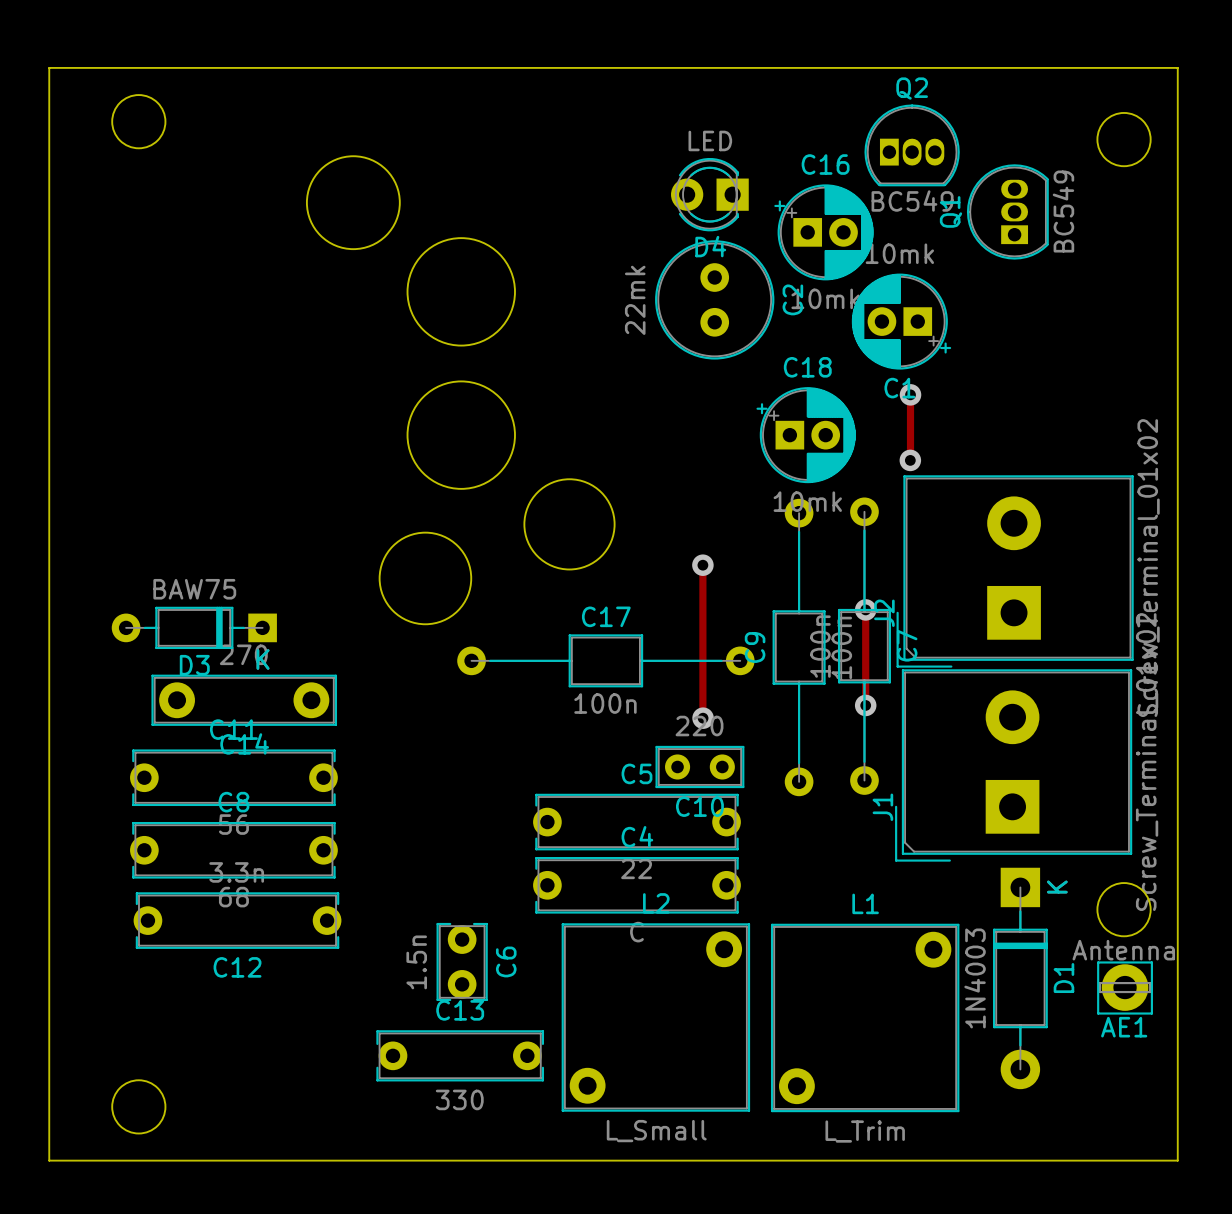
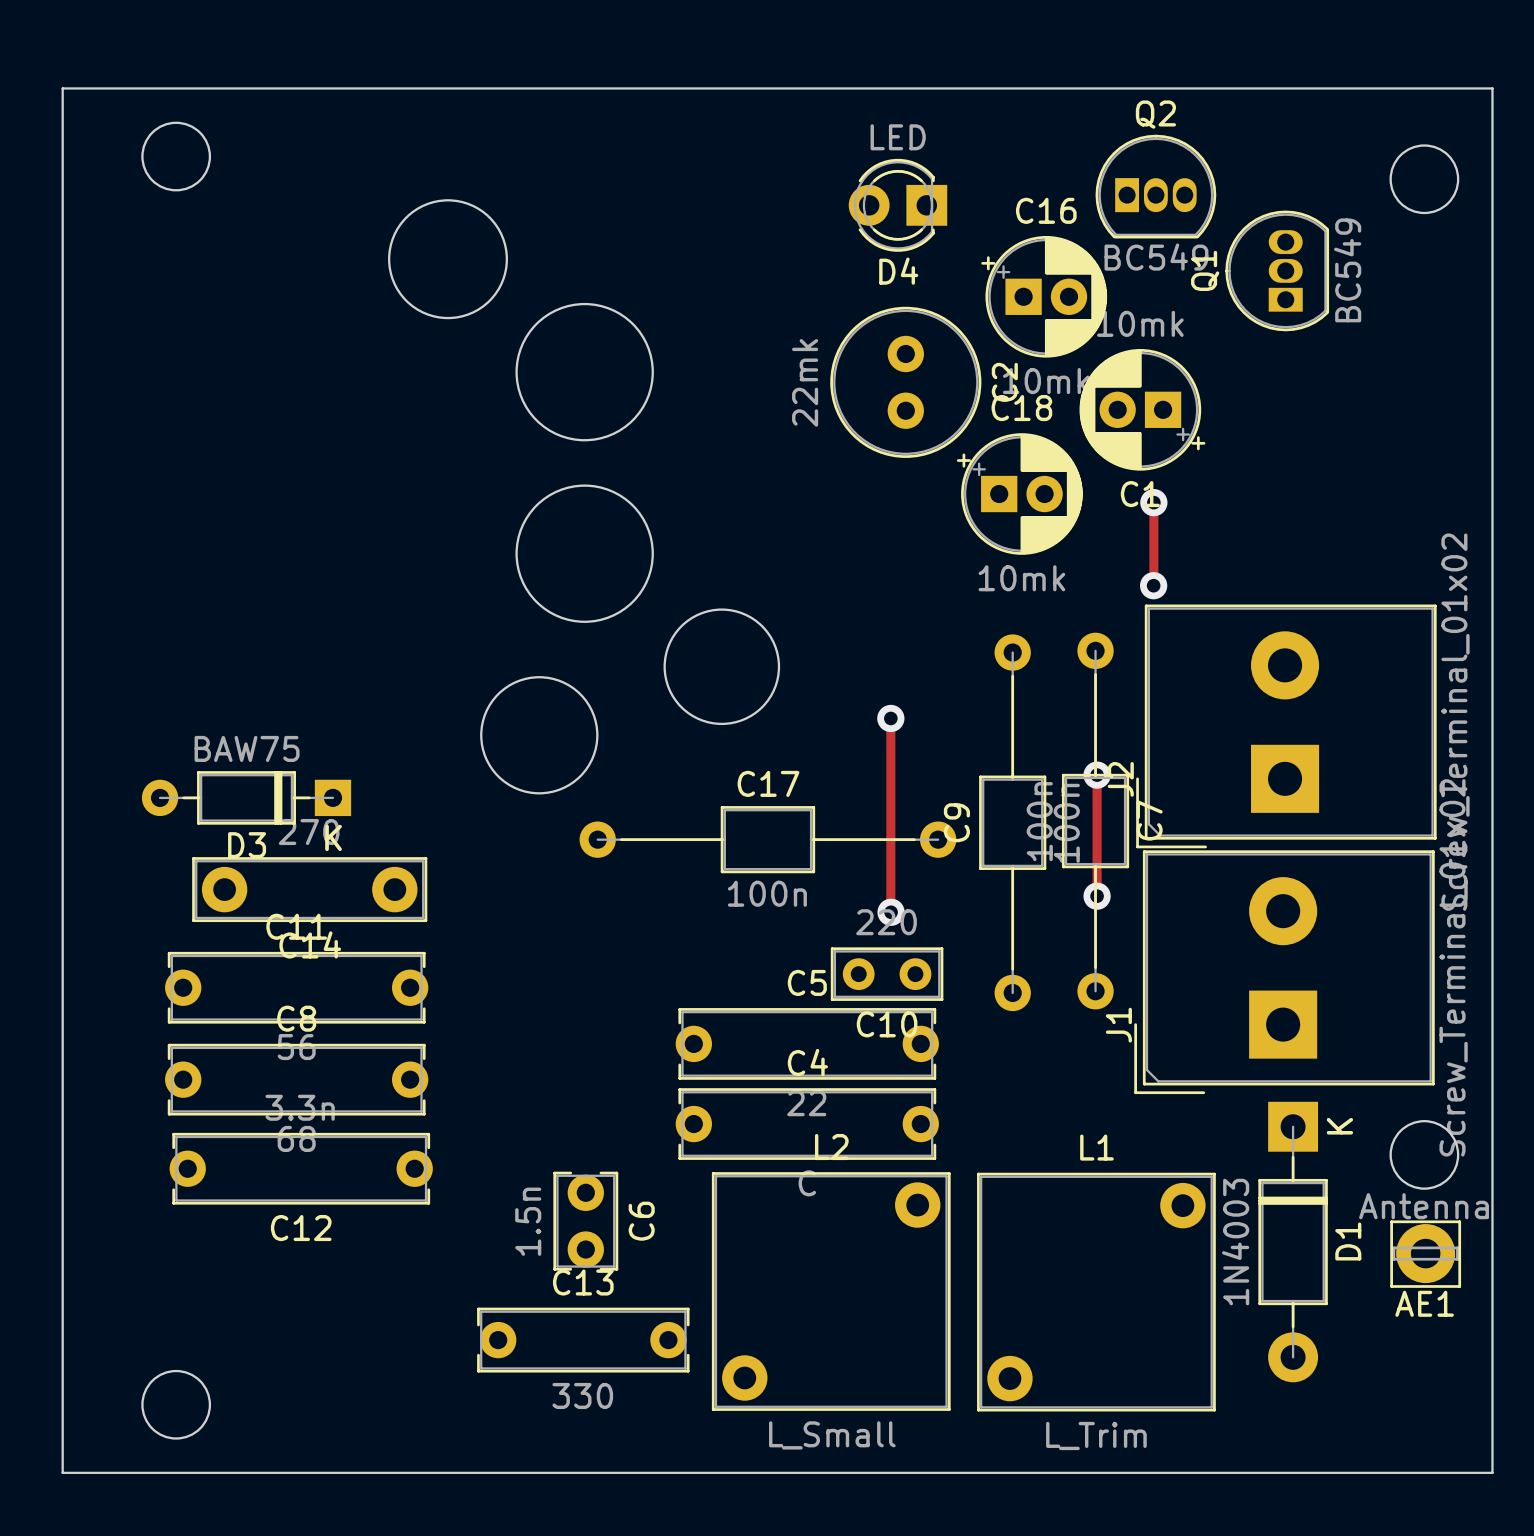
D4 position: (709, 194) -> (897, 205)
C18 position: (806, 435) -> (1019, 494)

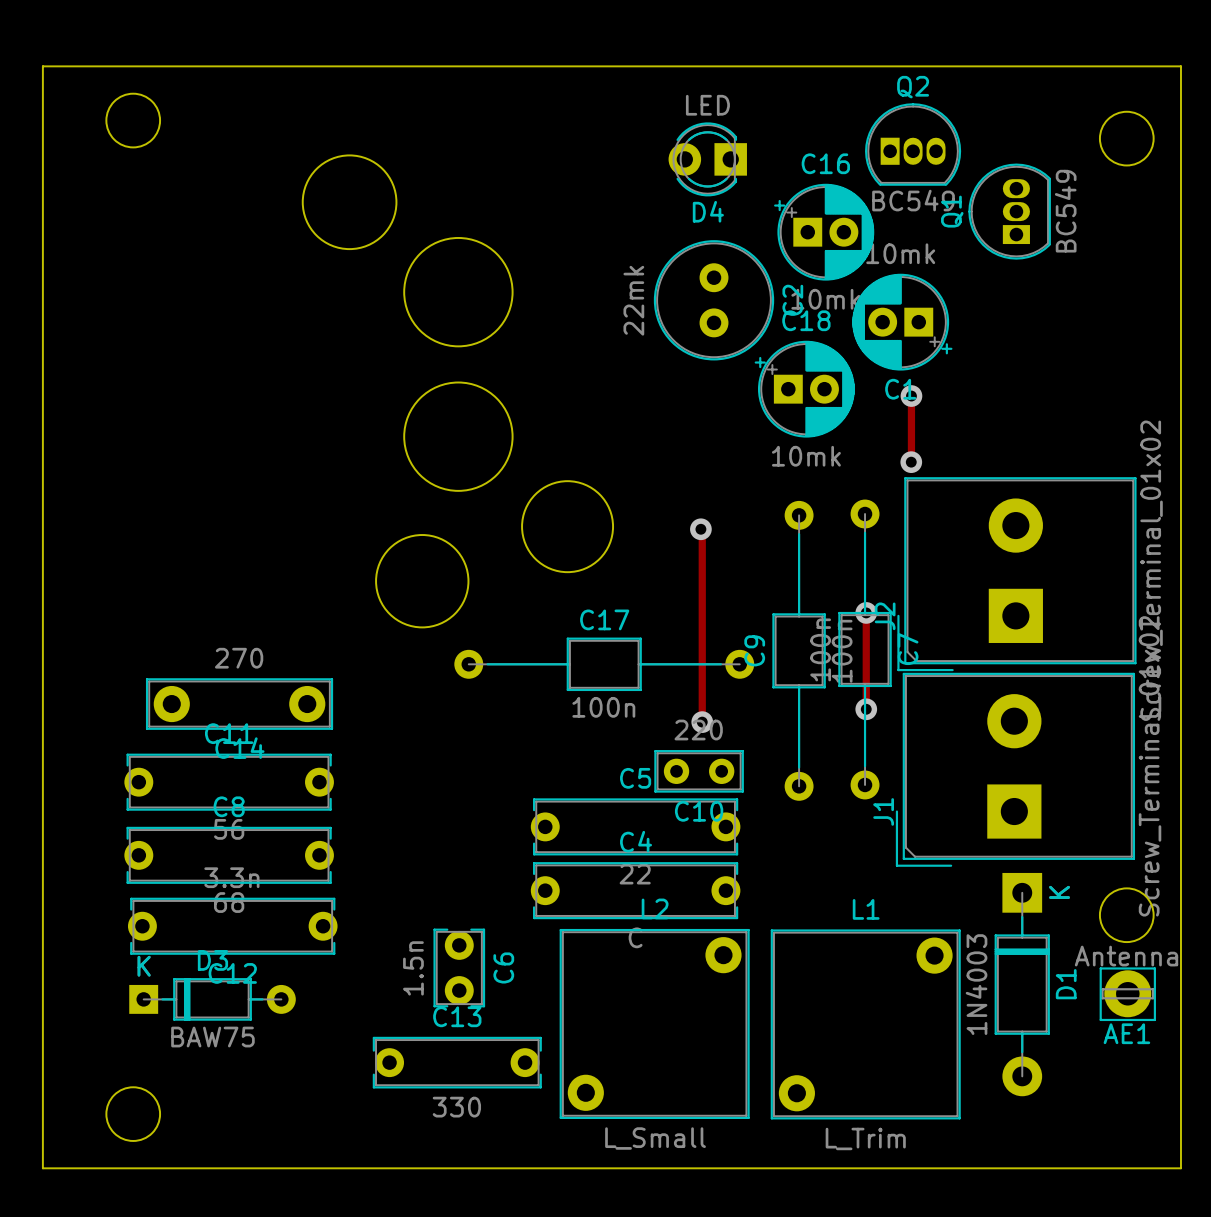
track: (890, 718) (890, 912) -> (700, 529) (702, 722)
via position: (890, 718) -> (700, 529)
D3 rotation: 0° (246, 797) -> 180° (212, 999)
D3 position: (246, 797) -> (212, 999)

